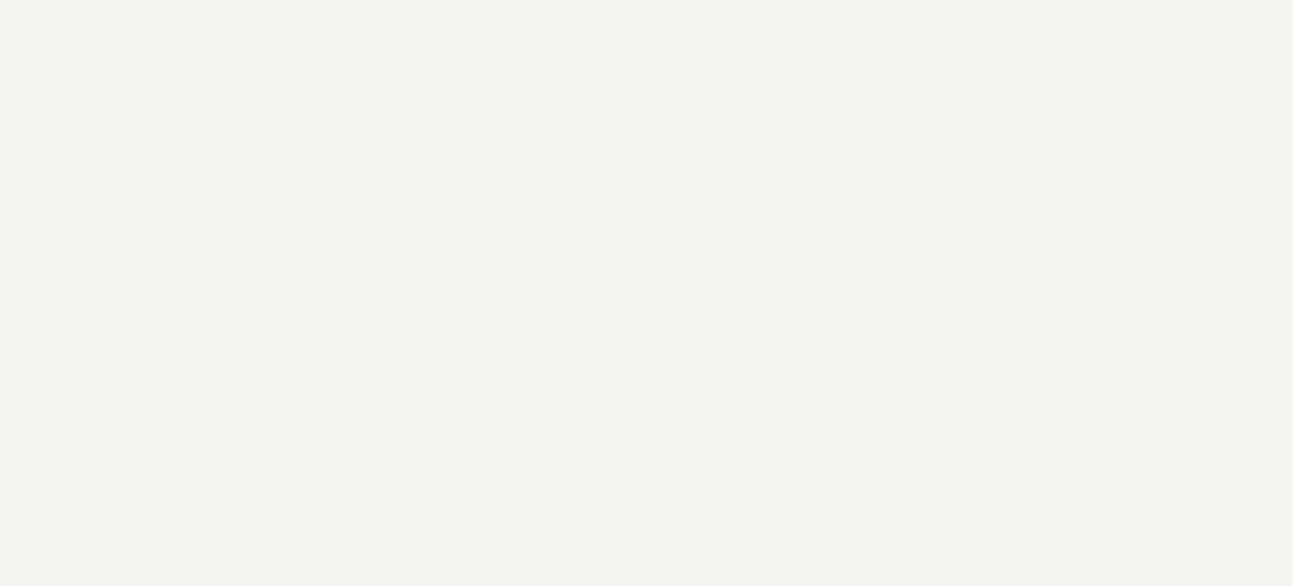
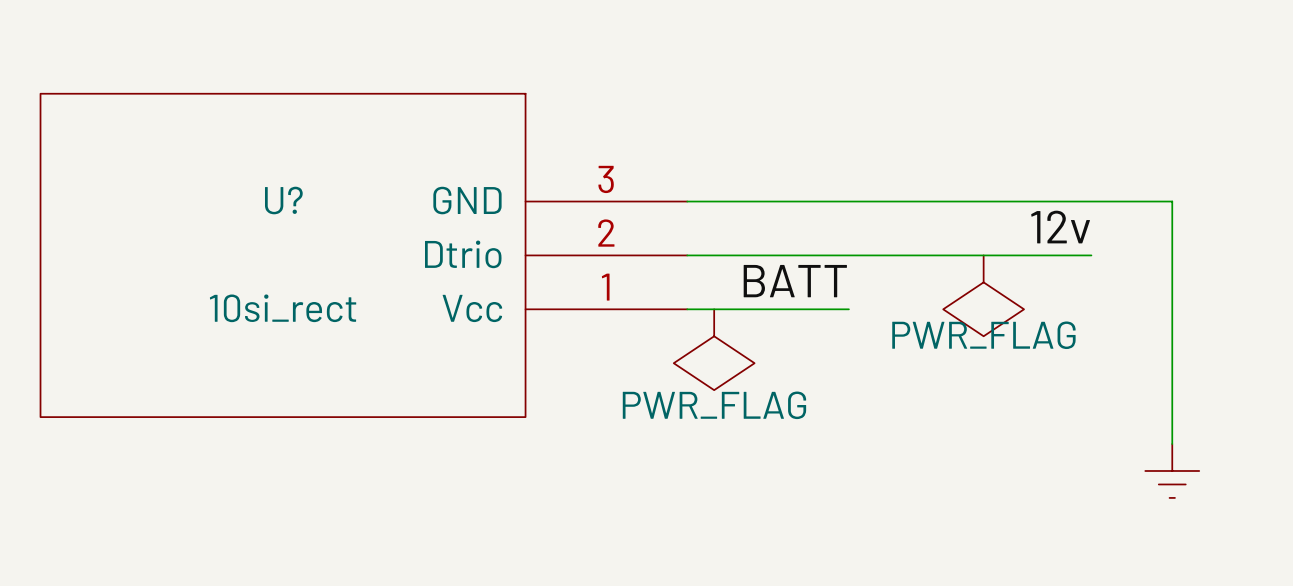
wire: none -> (687, 201) (1172, 201) (1172, 444)
label: none -> 12v (1060, 227)
U?: none -> 10si_rect (363, 255)
wire: none -> (687, 255) (1091, 255)
label: none -> BATT (795, 281)
power symbol: none -> PWR_FLAG (983, 295)
wire: none -> (687, 309) (848, 309)
power symbol: none -> PWR_FLAG (714, 349)
power symbol: none -> (1172, 470)

